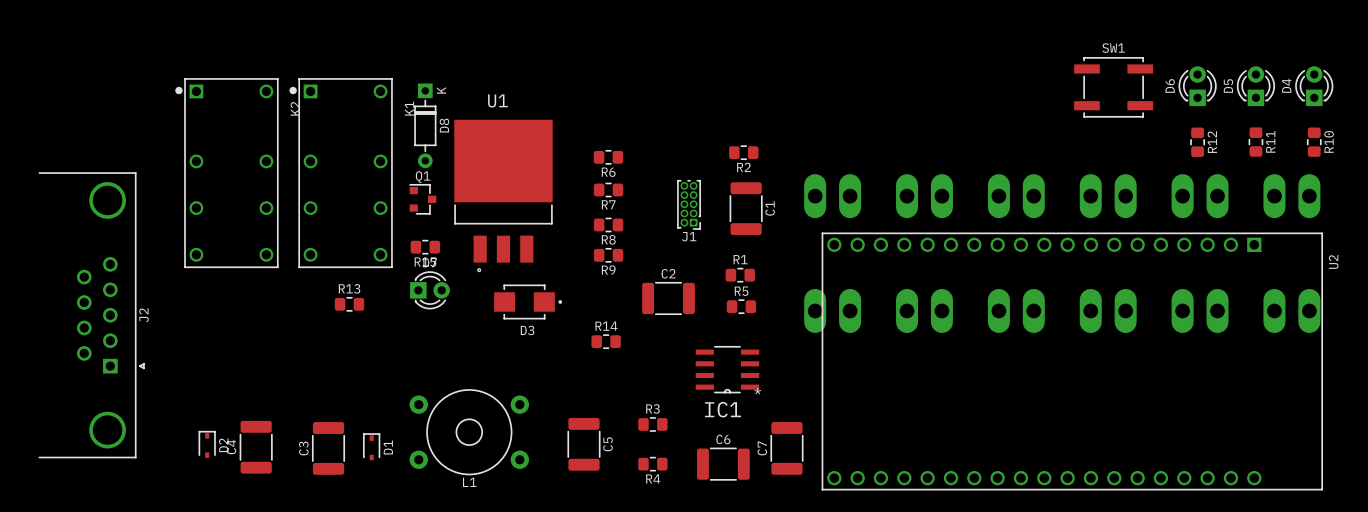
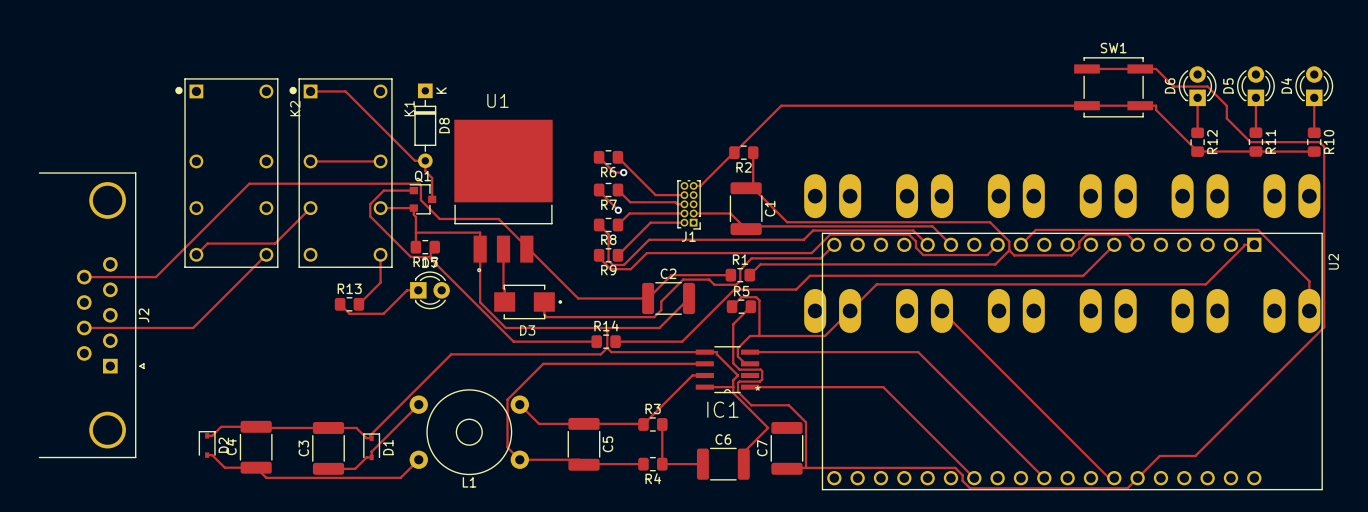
track: none -> (1086, 68) (1156, 68) (1173, 86) (1207, 86) (1226, 105) (1226, 118) (1250, 142) (1319, 142) (1324, 146) (1324, 327) (1195, 455) (1159, 455) (1127, 488) (970, 488) (962, 480) (962, 475) (955, 467) (786, 468)
track: none -> (310, 91) (345, 91) (414, 160) (425, 160) (425, 171) (432, 178) (432, 199)
track: none -> (1197, 97) (1197, 132)
track: none -> (1255, 97) (1255, 132)
track: none -> (1314, 97) (1314, 132)
track: none -> (1255, 151) (1197, 151) (1156, 109) (1156, 105) (781, 105) (700, 185) (693, 185)
track: none -> (1256, 151) (1314, 151)
track: none -> (753, 152) (753, 188)
track: none -> (599, 157) (614, 172) (623, 172)
track: none -> (617, 157) (655, 195) (684, 195)
track: none -> (310, 161) (380, 161)
via: none -> (623, 172)
track: none -> (753, 188) (787, 222) (990, 222) (1009, 241) (1009, 250)
track: none -> (599, 189) (618, 210)
track: none -> (617, 189) (630, 202) (675, 202) (677, 204) (684, 204)
track: none -> (413, 190) (383, 190) (370, 204) (370, 216) (410, 256) (430, 256)
track: none -> (310, 208) (275, 243) (207, 243) (196, 254)
track: none -> (380, 208) (413, 208) (413, 214) (415, 216) (415, 247)
via: none -> (618, 210)
track: none -> (684, 213) (629, 213) (617, 224)
track: none -> (693, 213) (730, 213) (746, 229) (748, 226) (932, 226) (950, 244)
track: none -> (684, 222) (650, 222) (617, 255)
track: none -> (599, 224) (608, 234) (608, 260) (612, 264) (623, 264) (649, 239) (803, 239) (813, 230) (913, 230) (927, 244)
track: none -> (415, 232) (480, 232) (480, 302) (505, 328) (659, 328) (688, 298)
track: none -> (834, 244) (820, 258) (751, 258) (740, 269) (740, 280) (736, 284) (714, 284) (709, 279) (683, 279) (661, 301) (661, 310) (654, 317) (546, 317) (544, 314) (544, 301)
track: none -> (997, 244) (987, 255) (923, 255) (915, 247) (915, 241) (909, 234) (830, 234) (811, 253) (646, 253) (630, 269) (610, 269) (599, 255)
track: none -> (1020, 244) (1035, 229) (1258, 229) (1309, 281) (1309, 310)
track: none -> (1114, 244) (1083, 275) (809, 275) (796, 289) (734, 289) (682, 341) (615, 341)
track: none -> (1137, 244) (1127, 234) (1086, 234) (1079, 242) (1079, 247) (1071, 255) (1014, 255) (1009, 250)
track: none -> (1254, 244) (1244, 244) (1205, 284) (876, 284) (825, 336) (750, 336) (737, 348) (737, 356) (745, 363) (750, 363)
track: none -> (434, 247) (430, 251) (430, 258) (513, 341) (596, 341)
track: none -> (503, 249) (504, 301)
track: none -> (1009, 250) (995, 264) (760, 264) (749, 275)
track: none -> (266, 254) (193, 327) (84, 327)
track: none -> (380, 254) (380, 282) (358, 304)
track: none -> (730, 275) (671, 275) (648, 298) (578, 298) (498, 218) (439, 218) (420, 200) (419, 183) (249, 183) (155, 277) (84, 277)
track: none -> (418, 290) (407, 290) (383, 313) (349, 313) (340, 304)
track: none -> (732, 306) (741, 297) (756, 297) (759, 300) (759, 336)
track: none -> (750, 306) (733, 324) (733, 363) (739, 369) (760, 369) (762, 379) (759, 381) (739, 381) (738, 391) (751, 405) (788, 405) (806, 422) (806, 467)
track: none -> (941, 310) (1109, 478) (1114, 478)
track: none -> (607, 328) (607, 347)
track: none -> (607, 347) (611, 352) (716, 352) (716, 354) (738, 375) (733, 380) (733, 393) (768, 427) (743, 452) (743, 464)
track: none -> (607, 347) (600, 354) (451, 354) (370, 435) (370, 438)
track: none -> (750, 352) (918, 352) (1044, 478)
track: none -> (704, 363) (543, 363) (507, 399) (507, 447) (519, 459) (578, 459) (583, 464) (643, 464)
track: none -> (704, 375) (692, 375) (643, 424) (539, 423) (519, 404)
track: none -> (704, 387) (733, 387)
track: none -> (750, 387) (883, 387) (974, 478)
track: none -> (418, 404) (371, 451)
track: none -> (662, 424) (662, 464) (702, 464)
track: none -> (207, 435) (212, 435) (221, 426) (356, 427) (366, 438) (371, 438)
track: none -> (371, 451) (371, 457) (366, 457) (355, 468) (328, 468)
track: none -> (207, 455) (212, 455) (224, 467) (256, 467) (266, 477) (400, 477) (418, 459)

